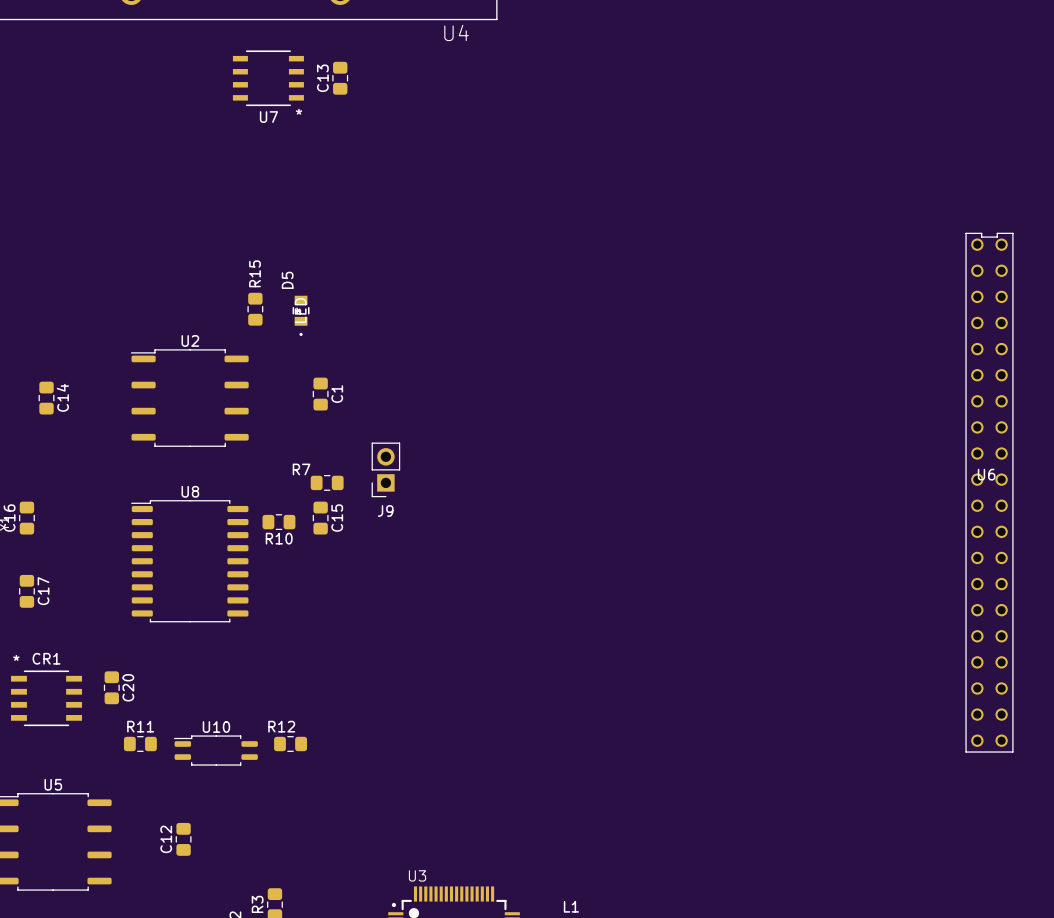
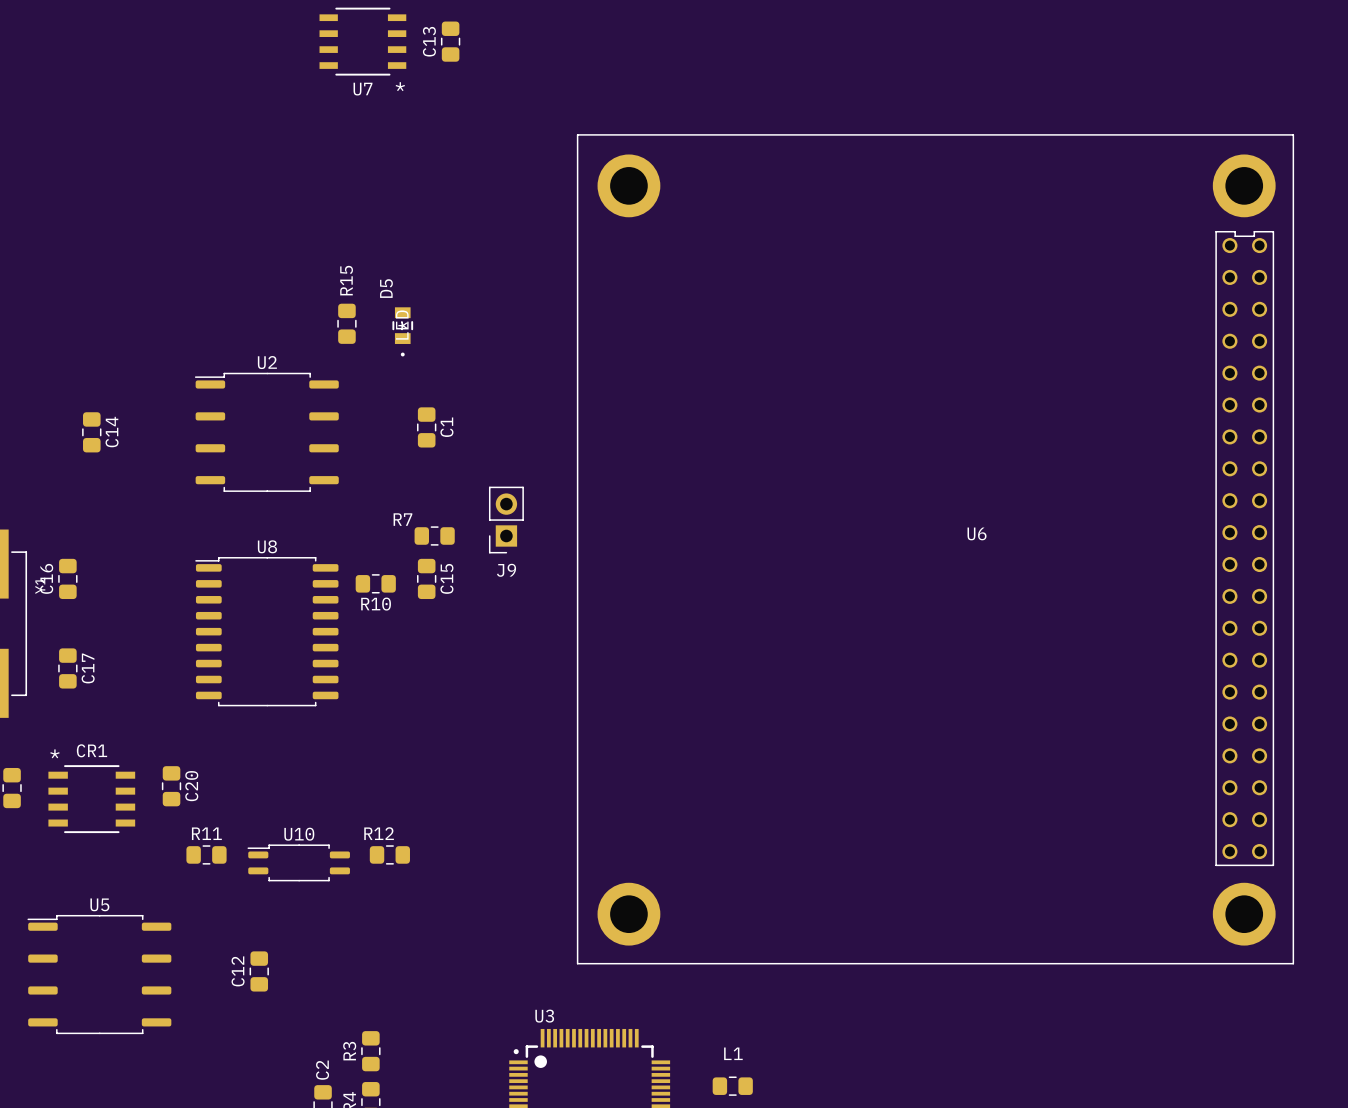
U6 footprint: [965, 232, 1014, 753] -> [576, 134, 1295, 965]
U6 name position: U6 (986, 474) -> U6 (977, 533)

